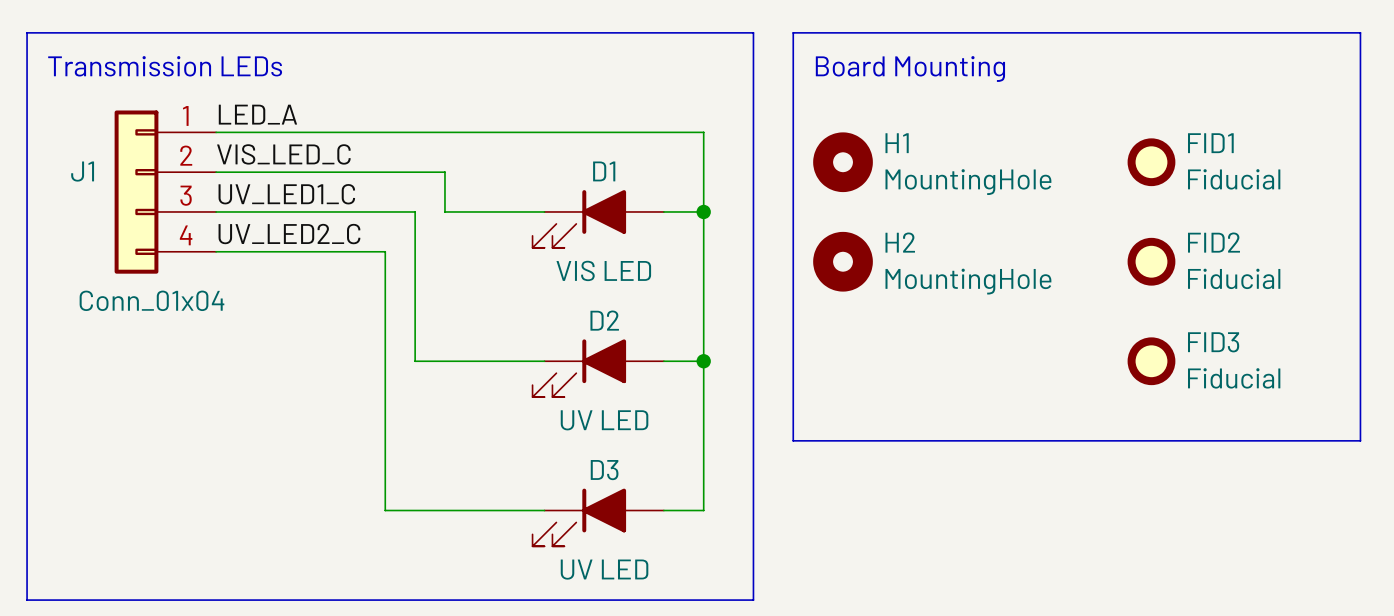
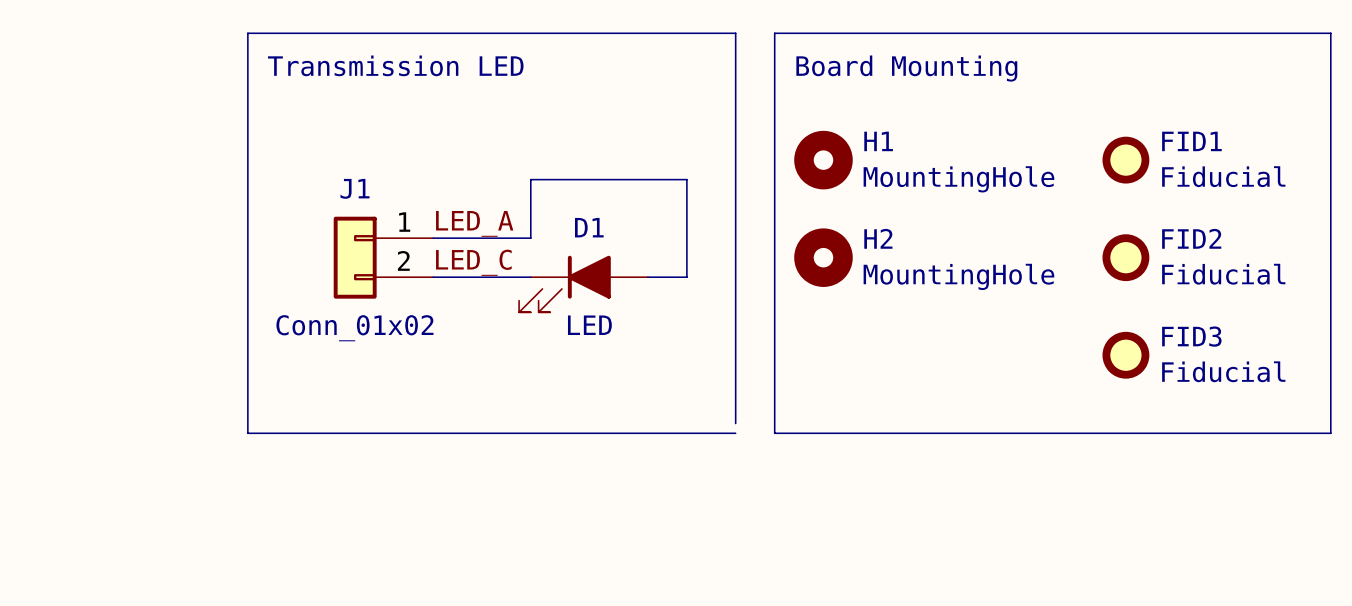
line: (255, 32) (27, 32) (27, 600) (753, 600) (753, 430) -> (247, 33) (247, 433) (735, 433)
text: Transmission LEDs (165, 66) -> Transmission LED (395, 65)
J1 symbol: [114, 110, 217, 274] -> [333, 216, 434, 299]
label position: LED_A (257, 114) -> LED_A (474, 223)
wire: (216, 132) (703, 132) (703, 182) -> (433, 238) (530, 238) (530, 179) (686, 179)
label: VIS_LED_C (283, 154) -> none
J1 name position: J1 (82, 171) -> J1 (354, 188)
D1 name position: D1 (604, 171) -> D1 (589, 227)
wire: (216, 172) (444, 172) (444, 211) (544, 211) -> none
label: UV_LED1_C (286, 194) -> none
wire: (216, 211) (415, 211) (415, 361) (544, 361) -> none
wire: (663, 211) (703, 211) -> none
junction: (703, 211) -> none
D1 position: (598, 218) -> (583, 284)
label: UV_LED2_C (289, 234) -> none
wire: (216, 251) (385, 251) (385, 510) (544, 510) -> none
label: none -> LED_C (473, 262)
D1 value: VIS LED (603, 270) -> LED (589, 325)
wire: none -> (433, 277) (530, 277)
wire: (703, 281) (703, 510) (663, 510) -> (686, 277) (647, 277)
J1 value: Conn_01x04 (151, 300) -> Conn_01x02 (354, 328)
wire: (663, 361) (703, 361) -> none
junction: (703, 361) -> none
D2: UV LED (598, 368) -> none
D3: UV LED (598, 517) -> none

